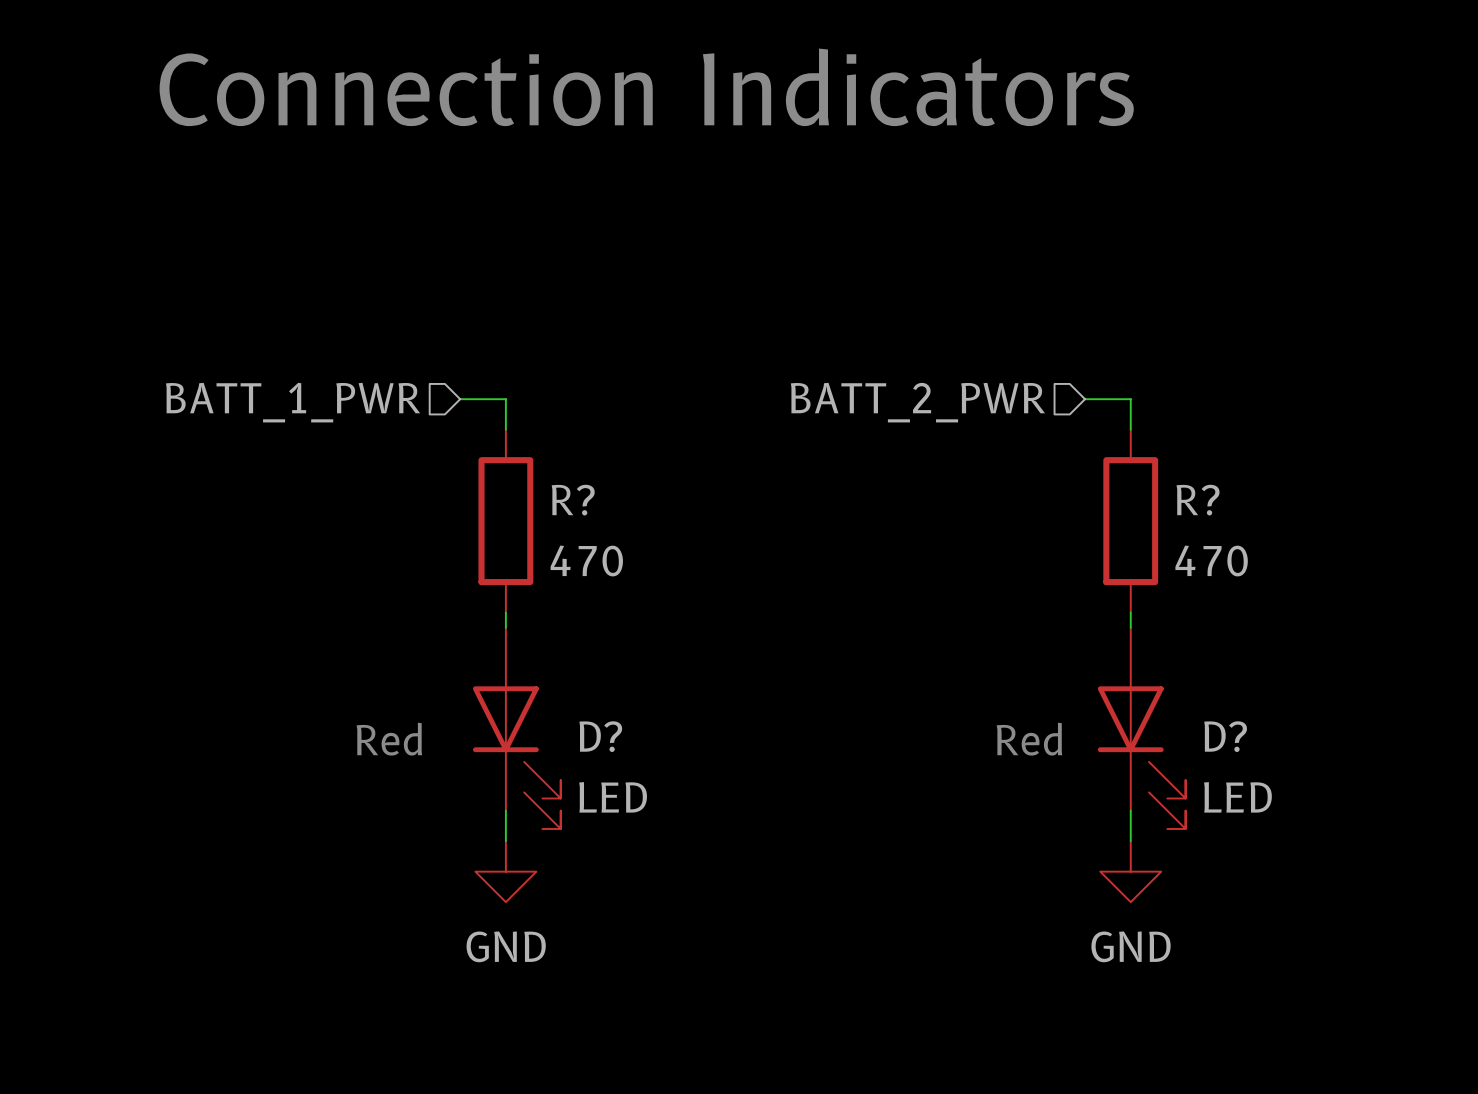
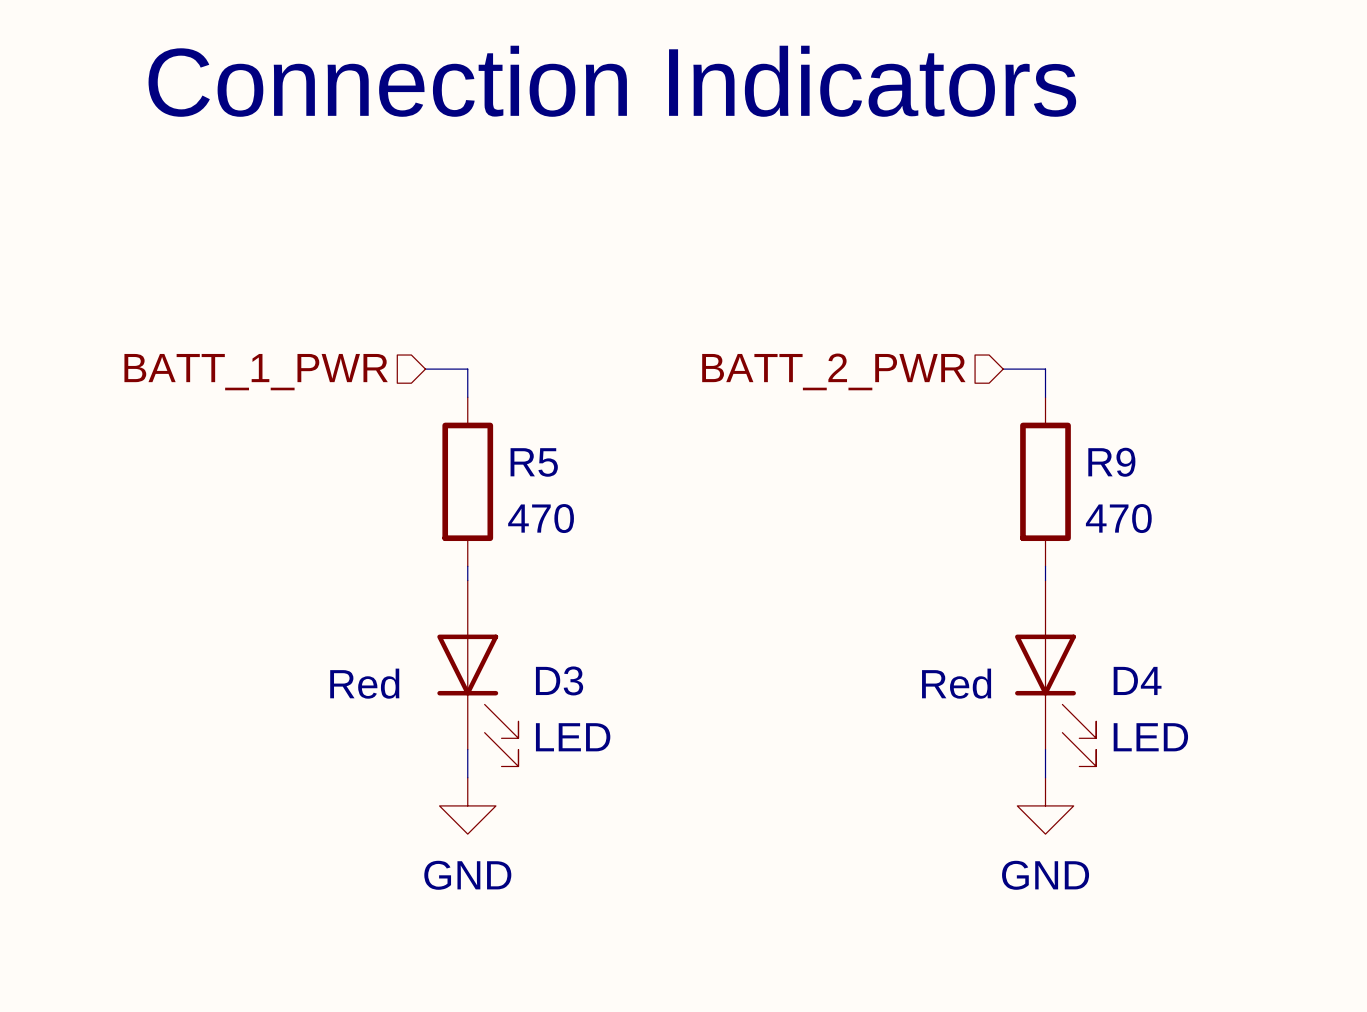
R? name: R? (573, 500) -> R5 (534, 462)
R? name: R? (1198, 500) -> R9 (1111, 462)
D? name: D? (600, 736) -> D3 (559, 680)
D? name: D? (1225, 736) -> D4 (1137, 680)

